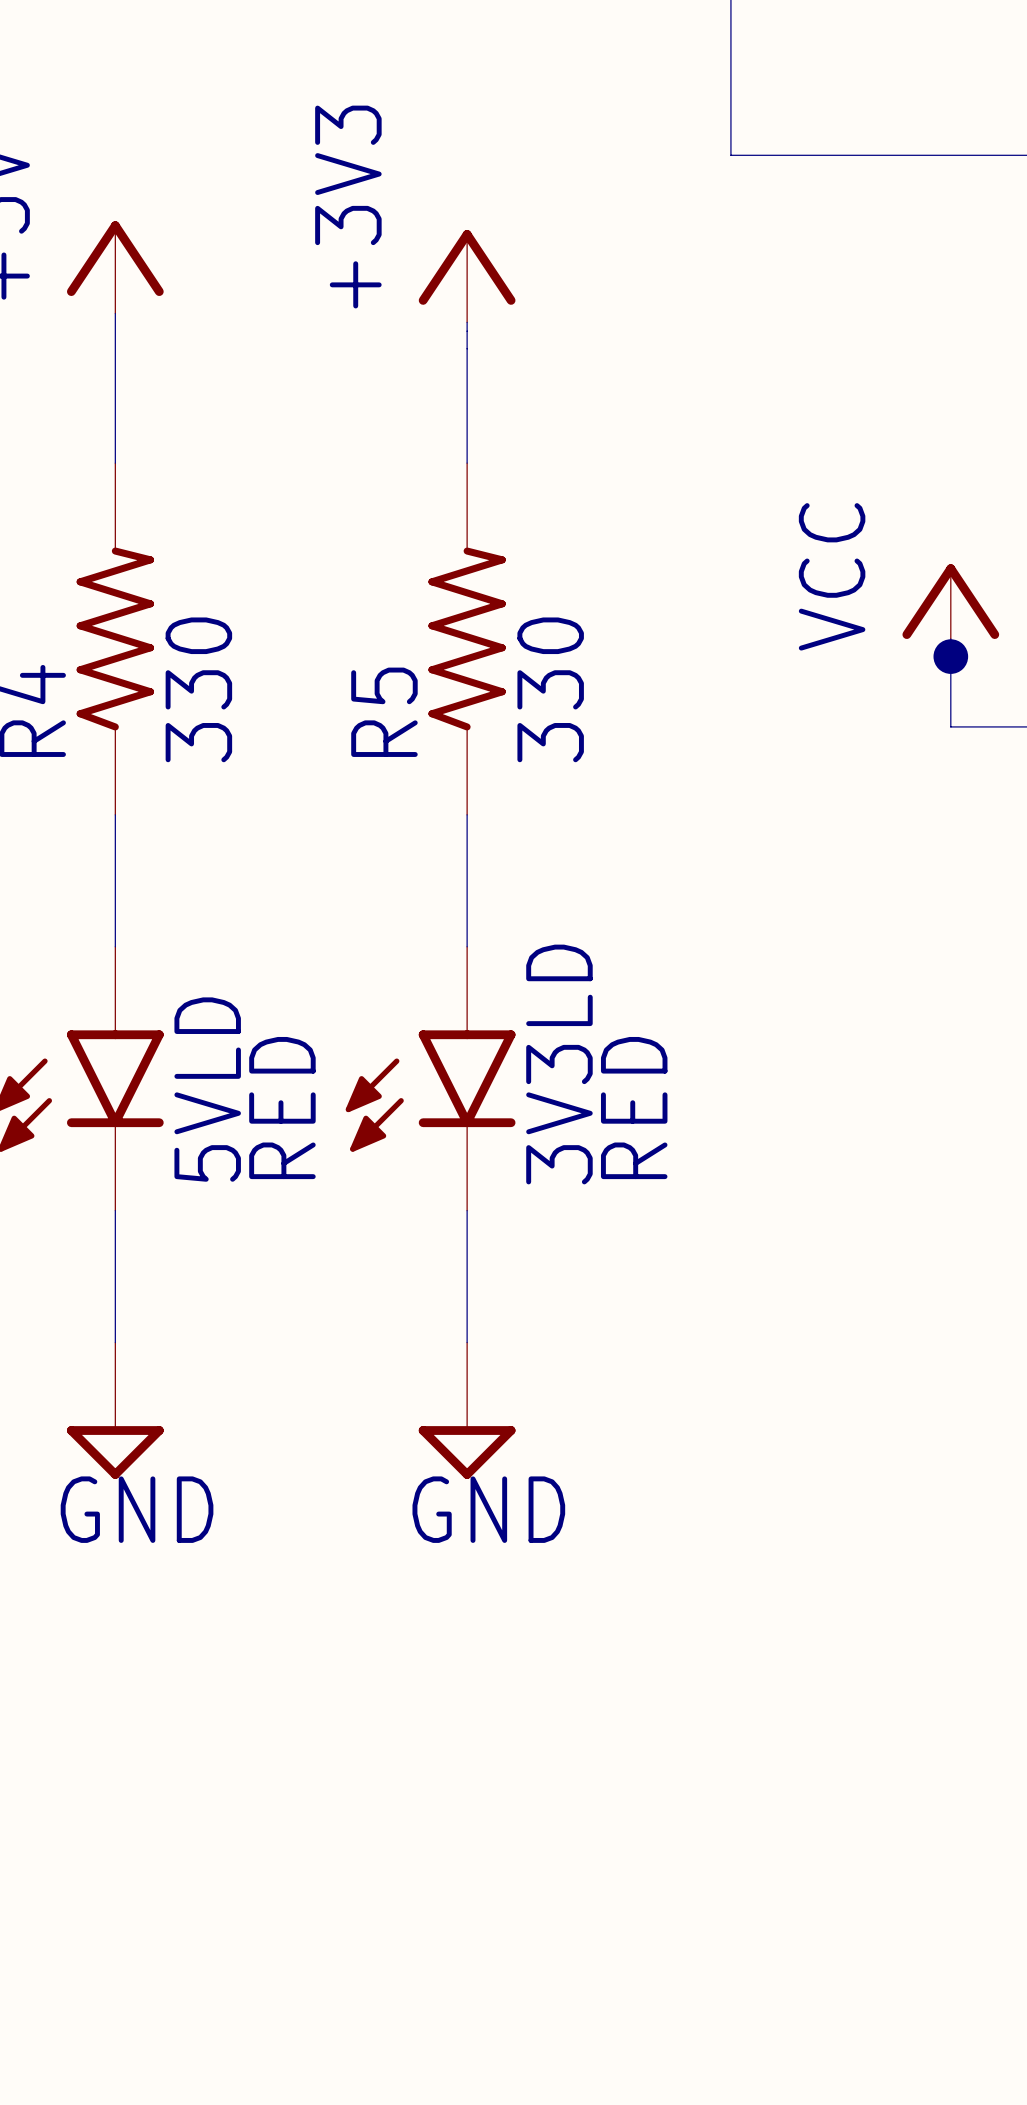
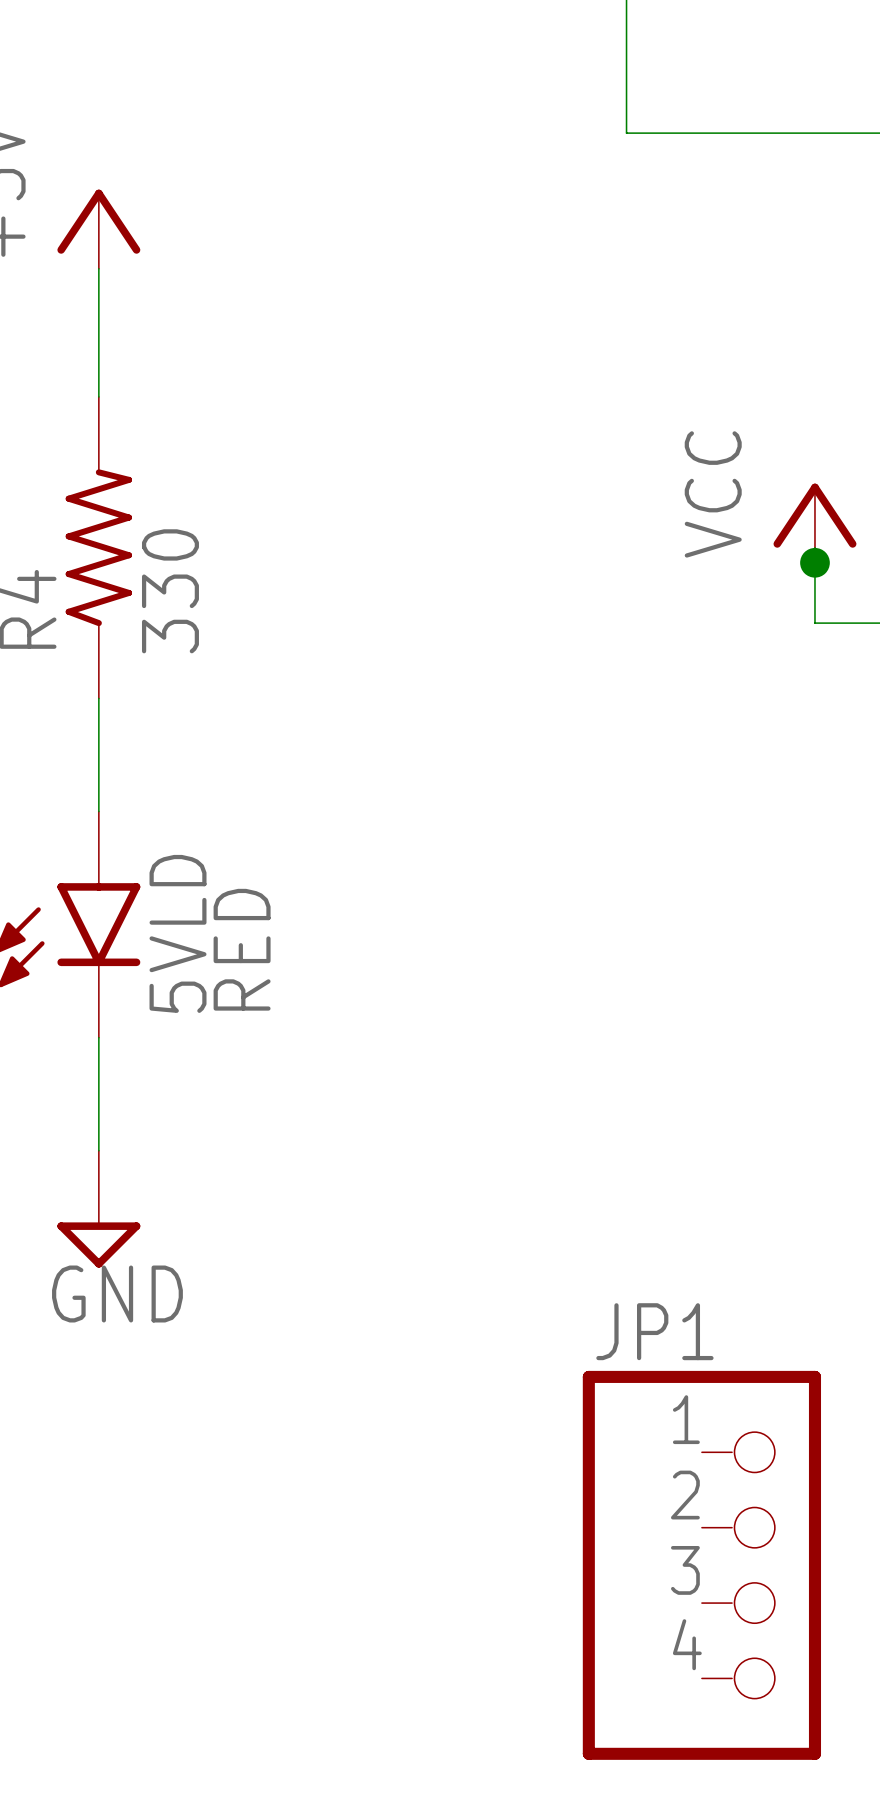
power symbol: +3V3 (467, 276) -> none
wire: (467, 322) (467, 463) -> none
R5: 330 (467, 639) -> none
wire: (467, 814) (467, 946) -> none
3V3LD: RED (430, 1078) -> none
wire: (467, 1210) (467, 1342) -> none
power symbol: GND (467, 1410) -> none
JP1: none -> (701, 1565)

